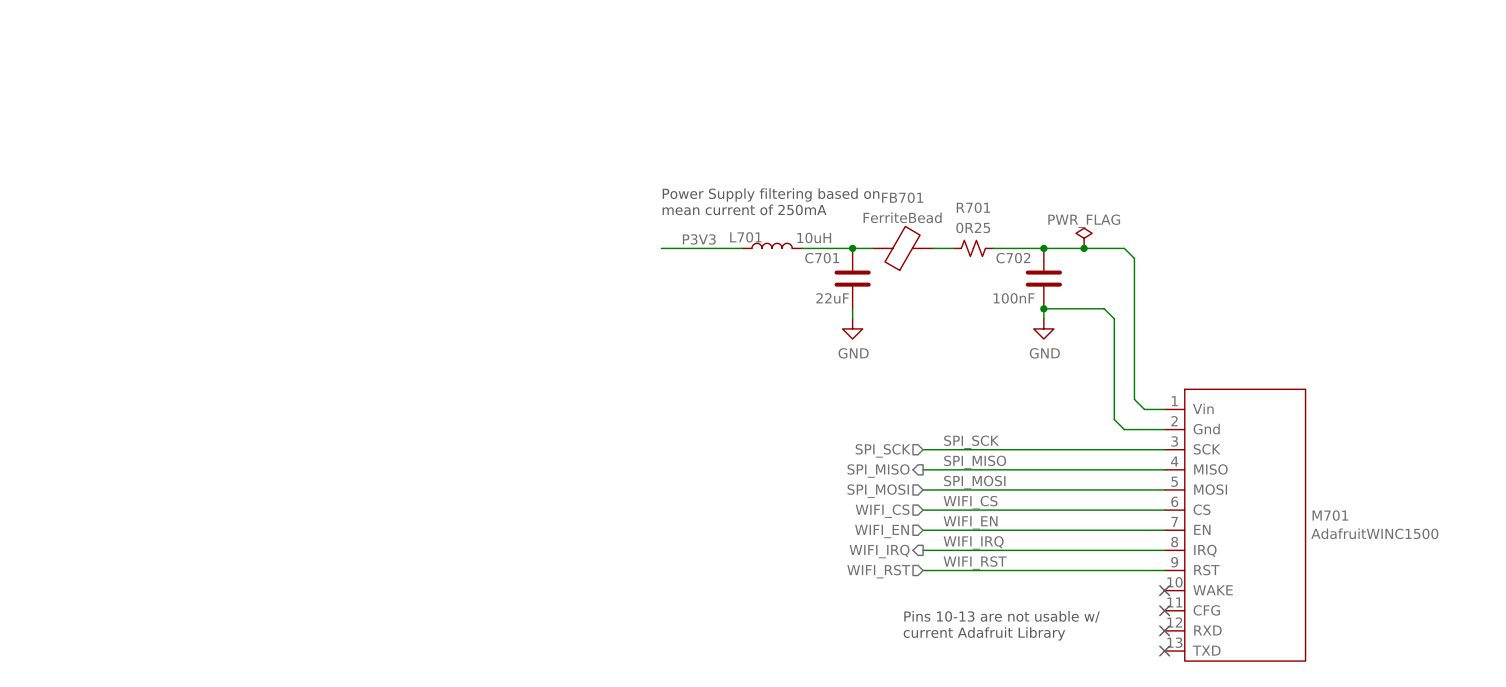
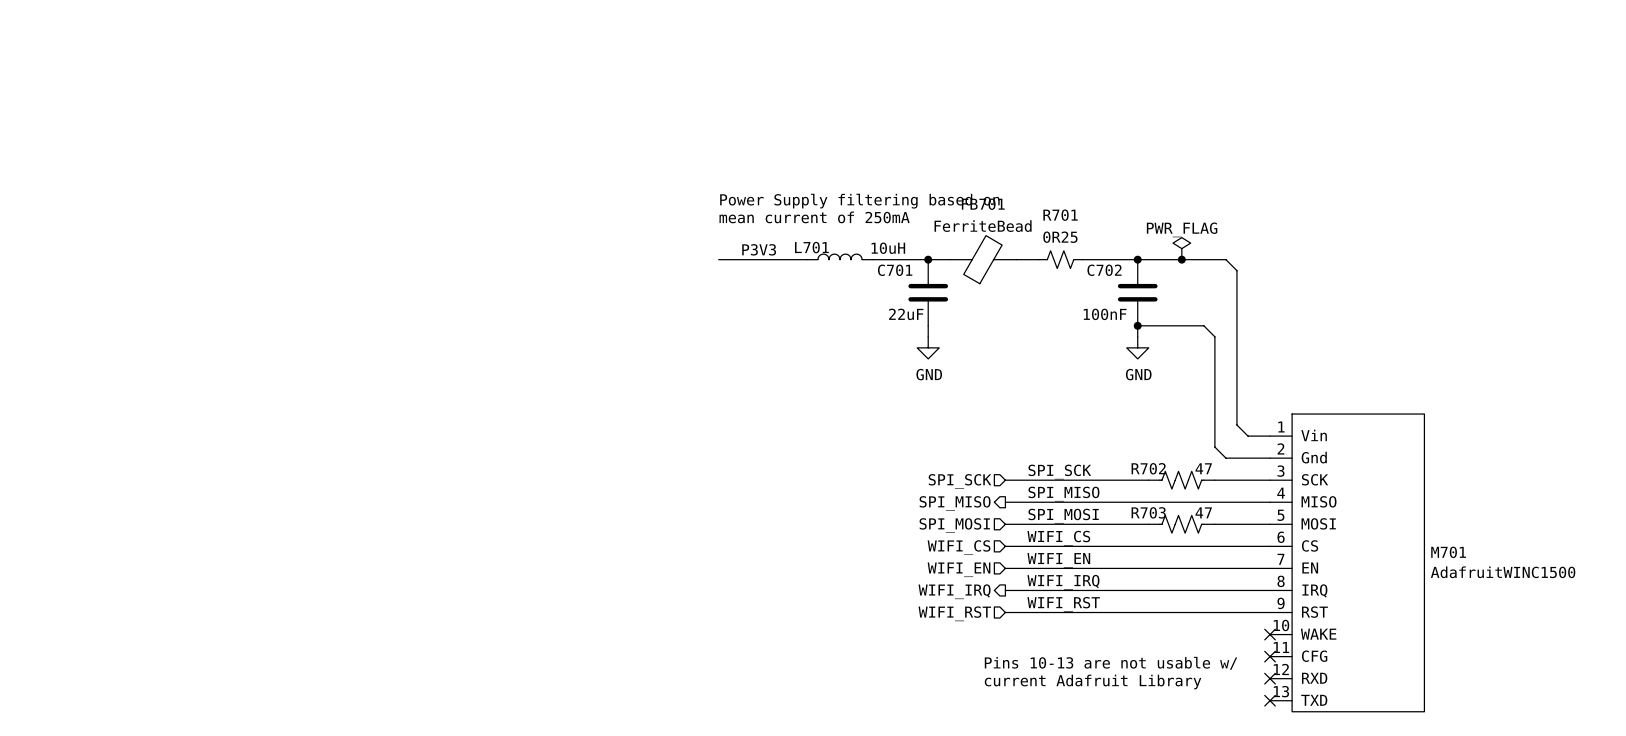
R702: none -> 47 (1181, 480)
R703: none -> 47 (1181, 524)

